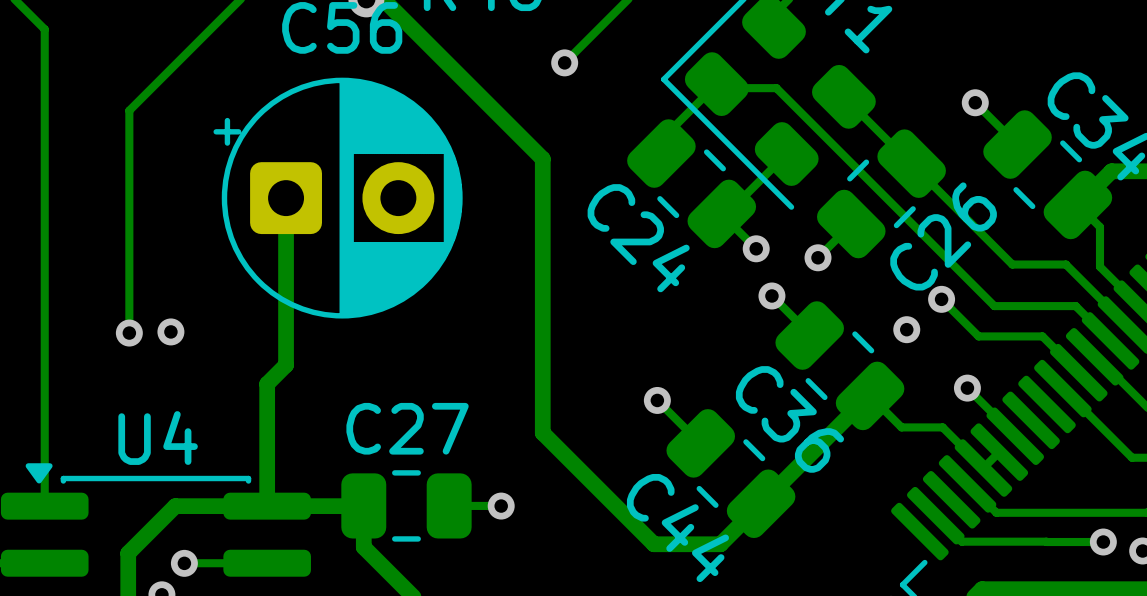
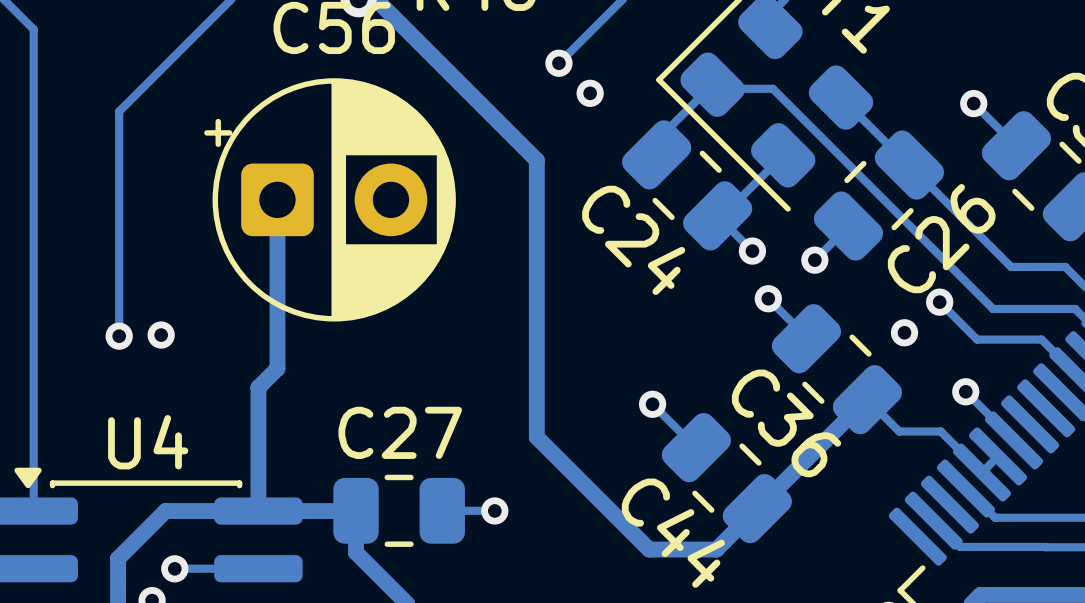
via: none -> (590, 93)

